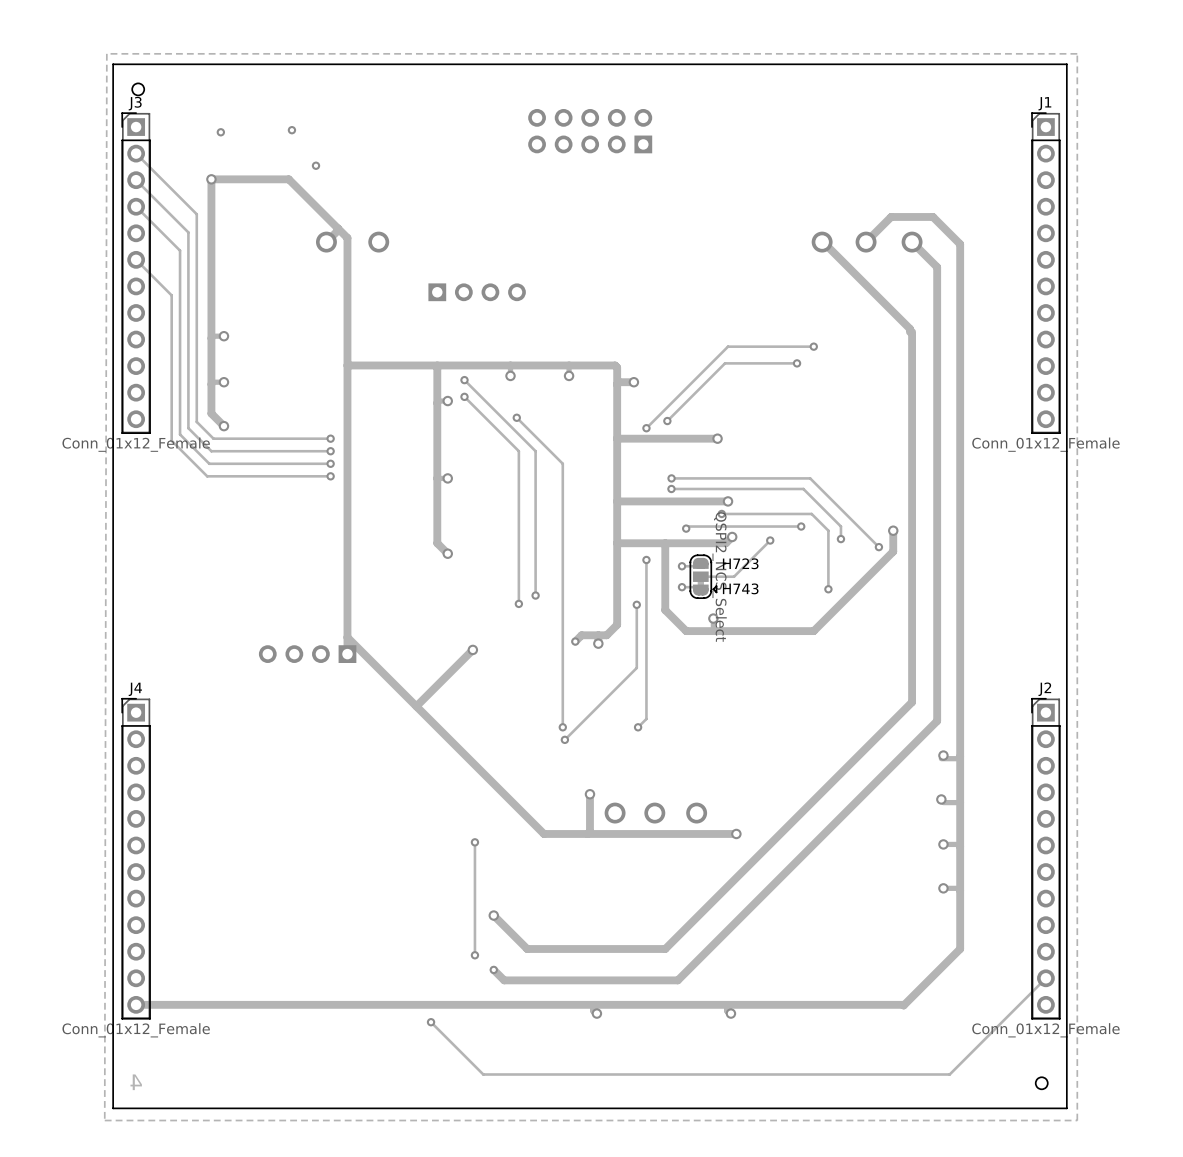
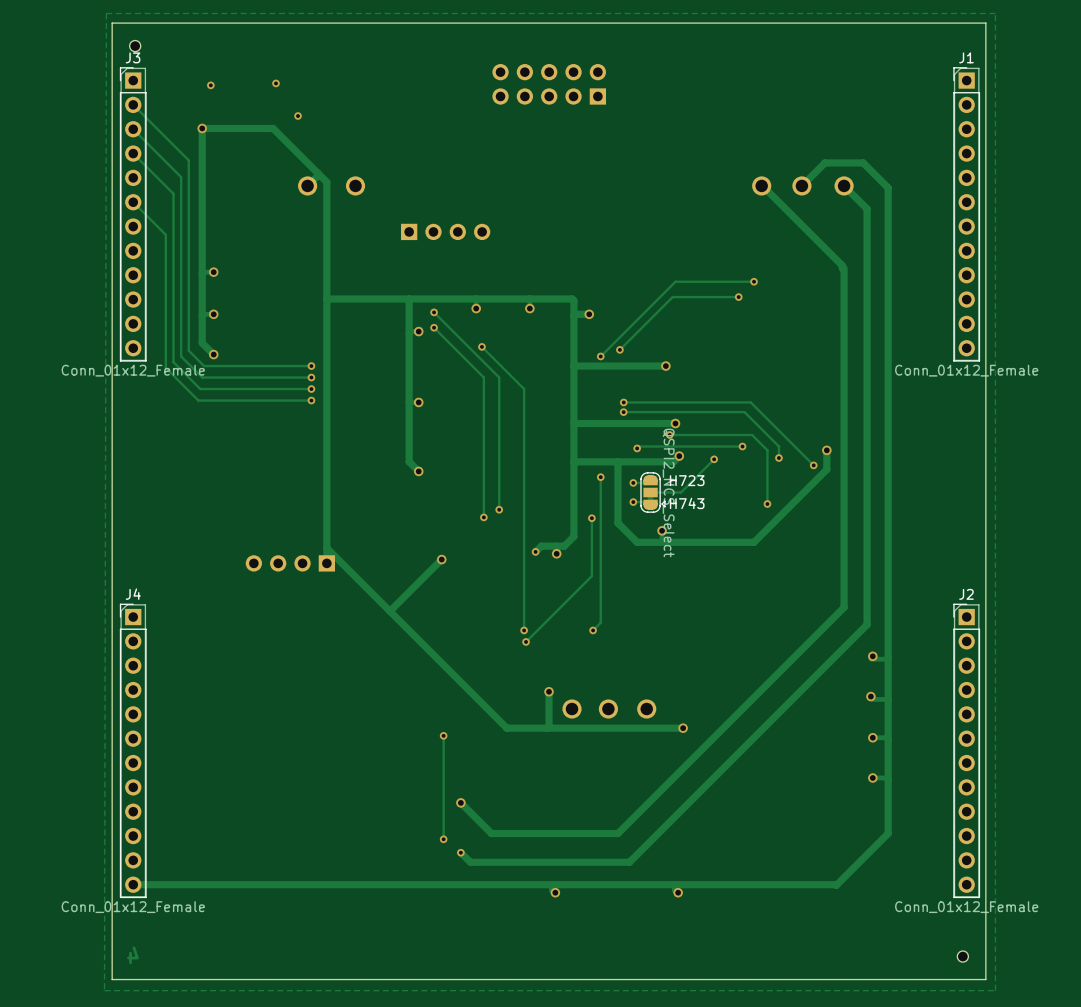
track: (1045, 978) (949, 1074) (483, 1074) (431, 1022) -> none
via: (431, 1022) -> none

